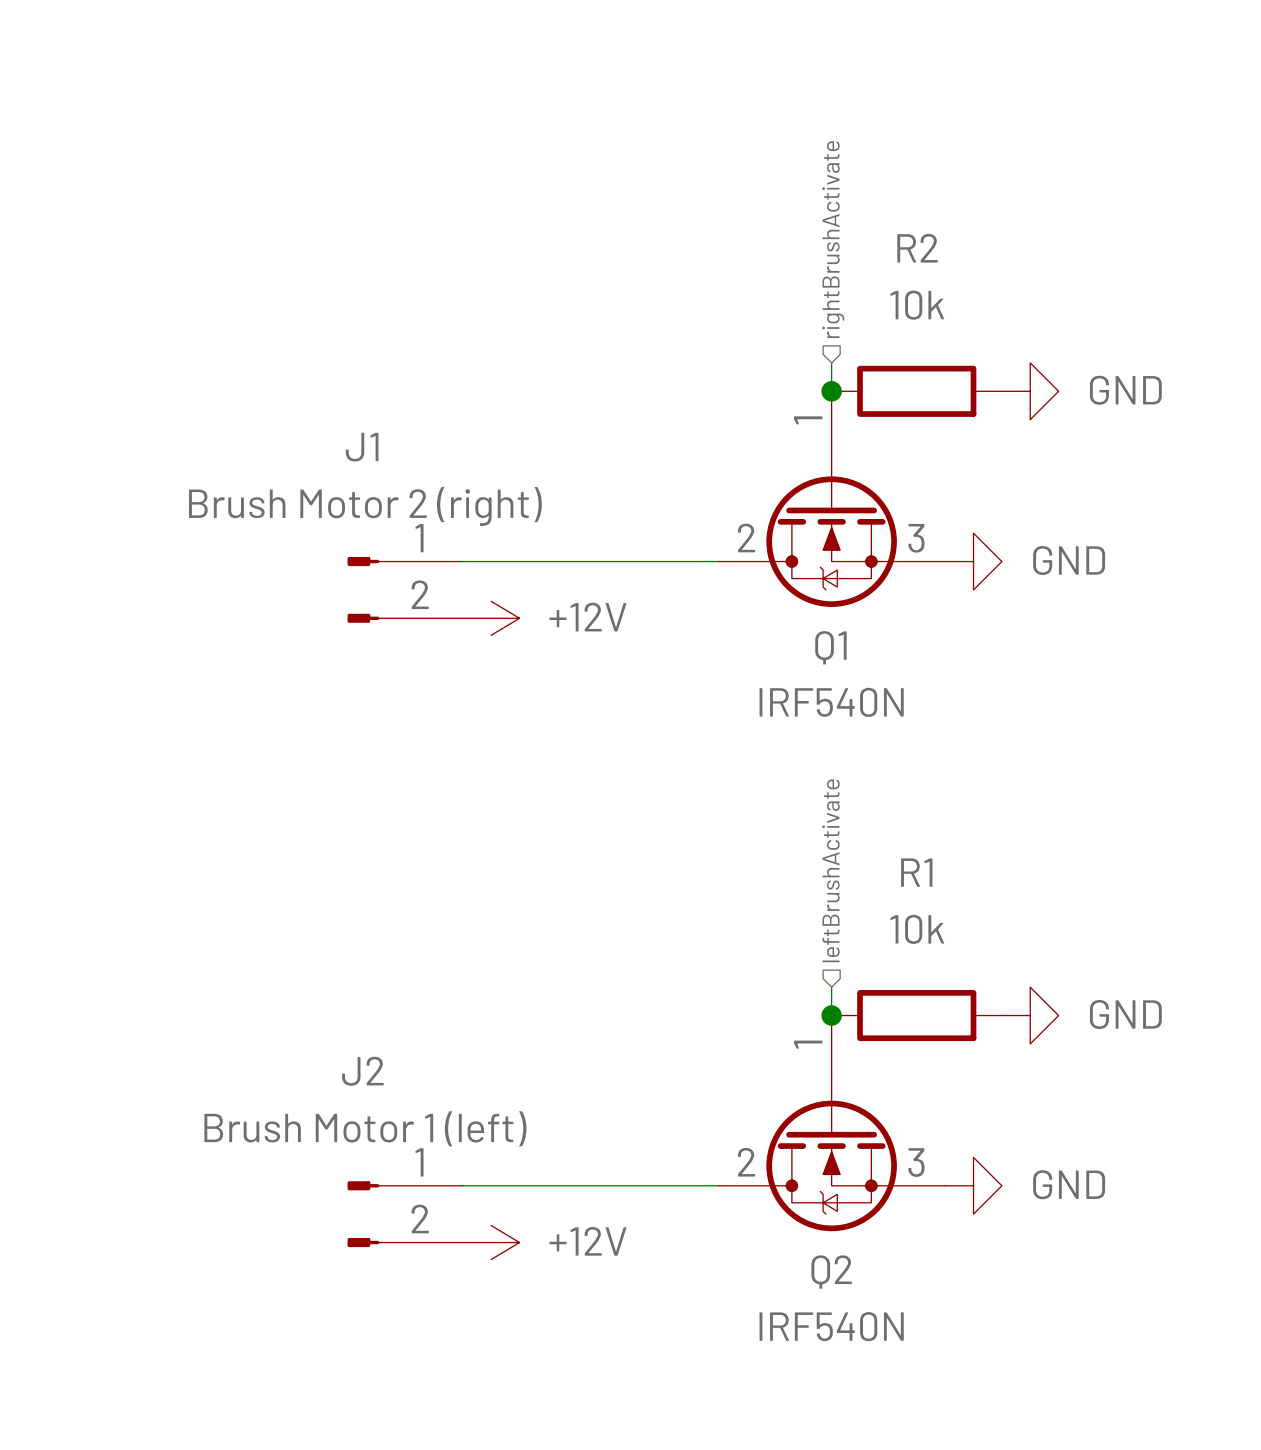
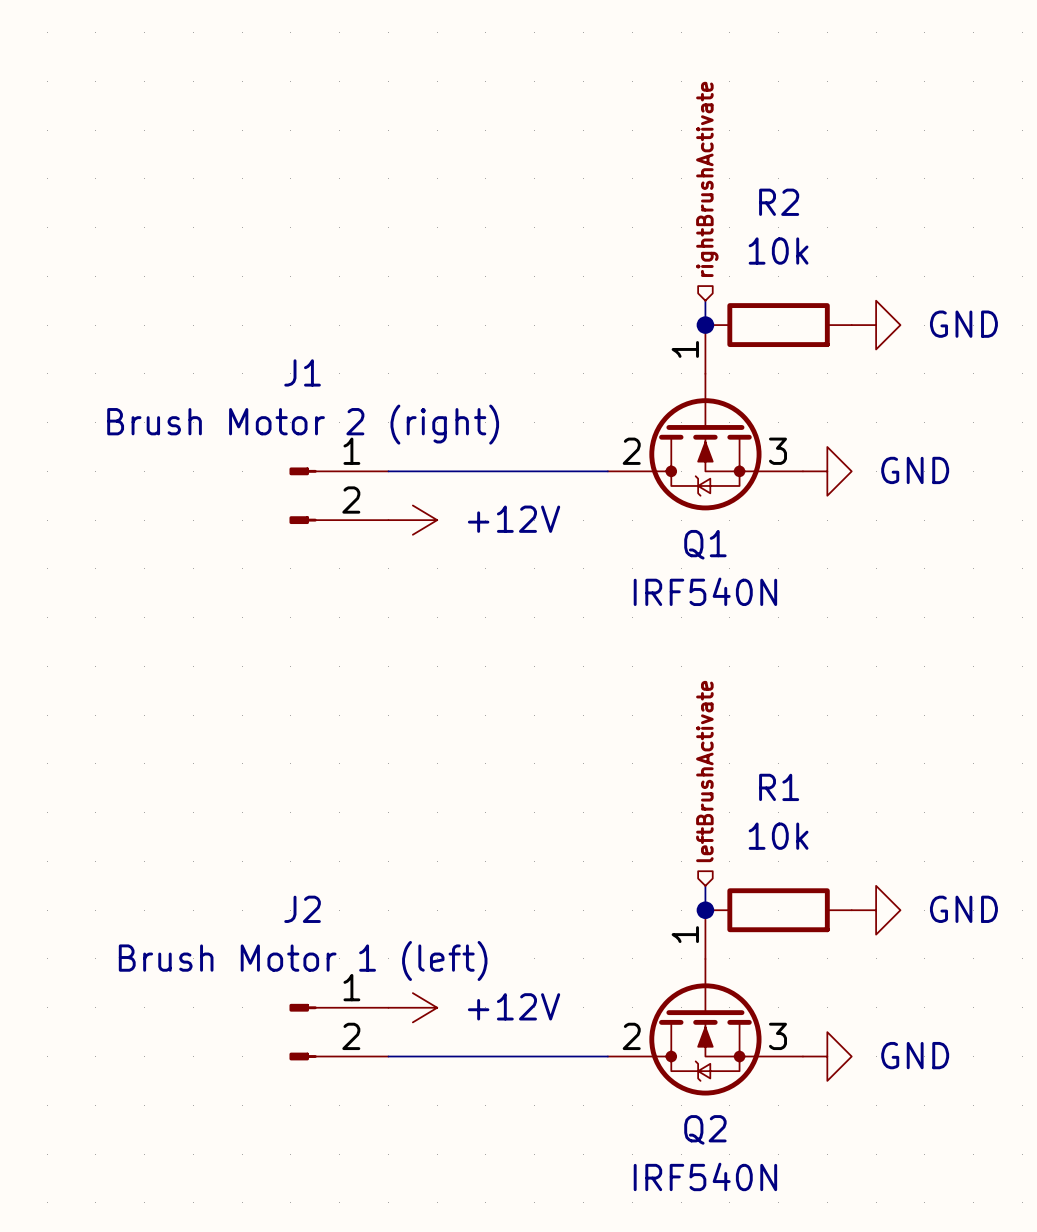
hierarchical label position: leftBrushActivate (830, 870) -> leftBrushActivate (704, 771)
junction position: (831, 1015) -> (705, 910)
R1 position: (916, 1015) -> (778, 910)
power symbol position: GND (1030, 1015) -> GND (876, 910)
Q2 position: (831, 1123) -> (705, 1002)
wire: (462, 1185) (718, 1185) -> (388, 1056) (607, 1056)
power symbol position: GND (973, 1185) -> GND (827, 1056)
power symbol position: +12V (491, 1242) -> +12V (412, 1007)

